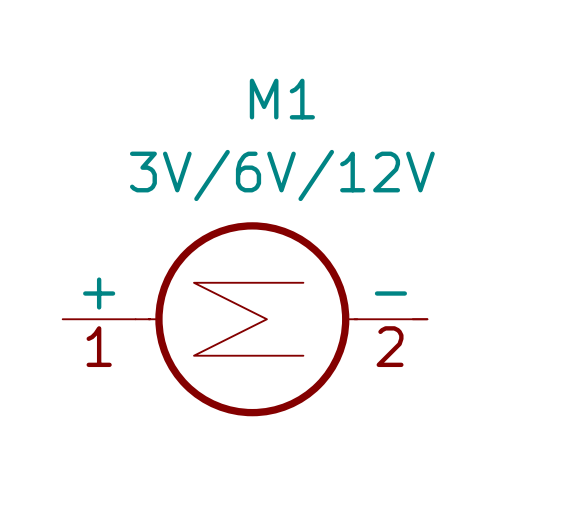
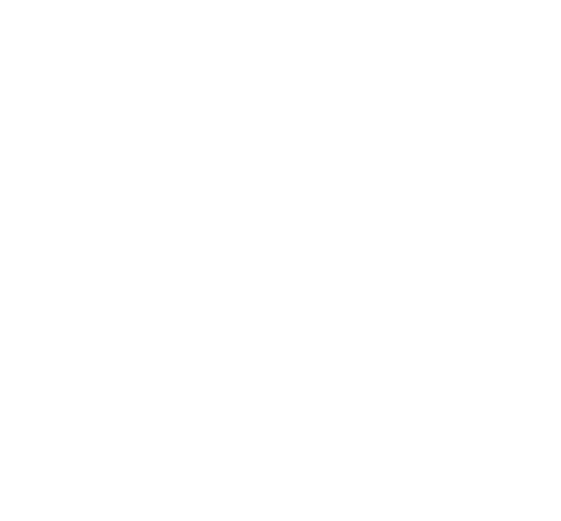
M1: 3V/6V/12V (245, 319) -> none

